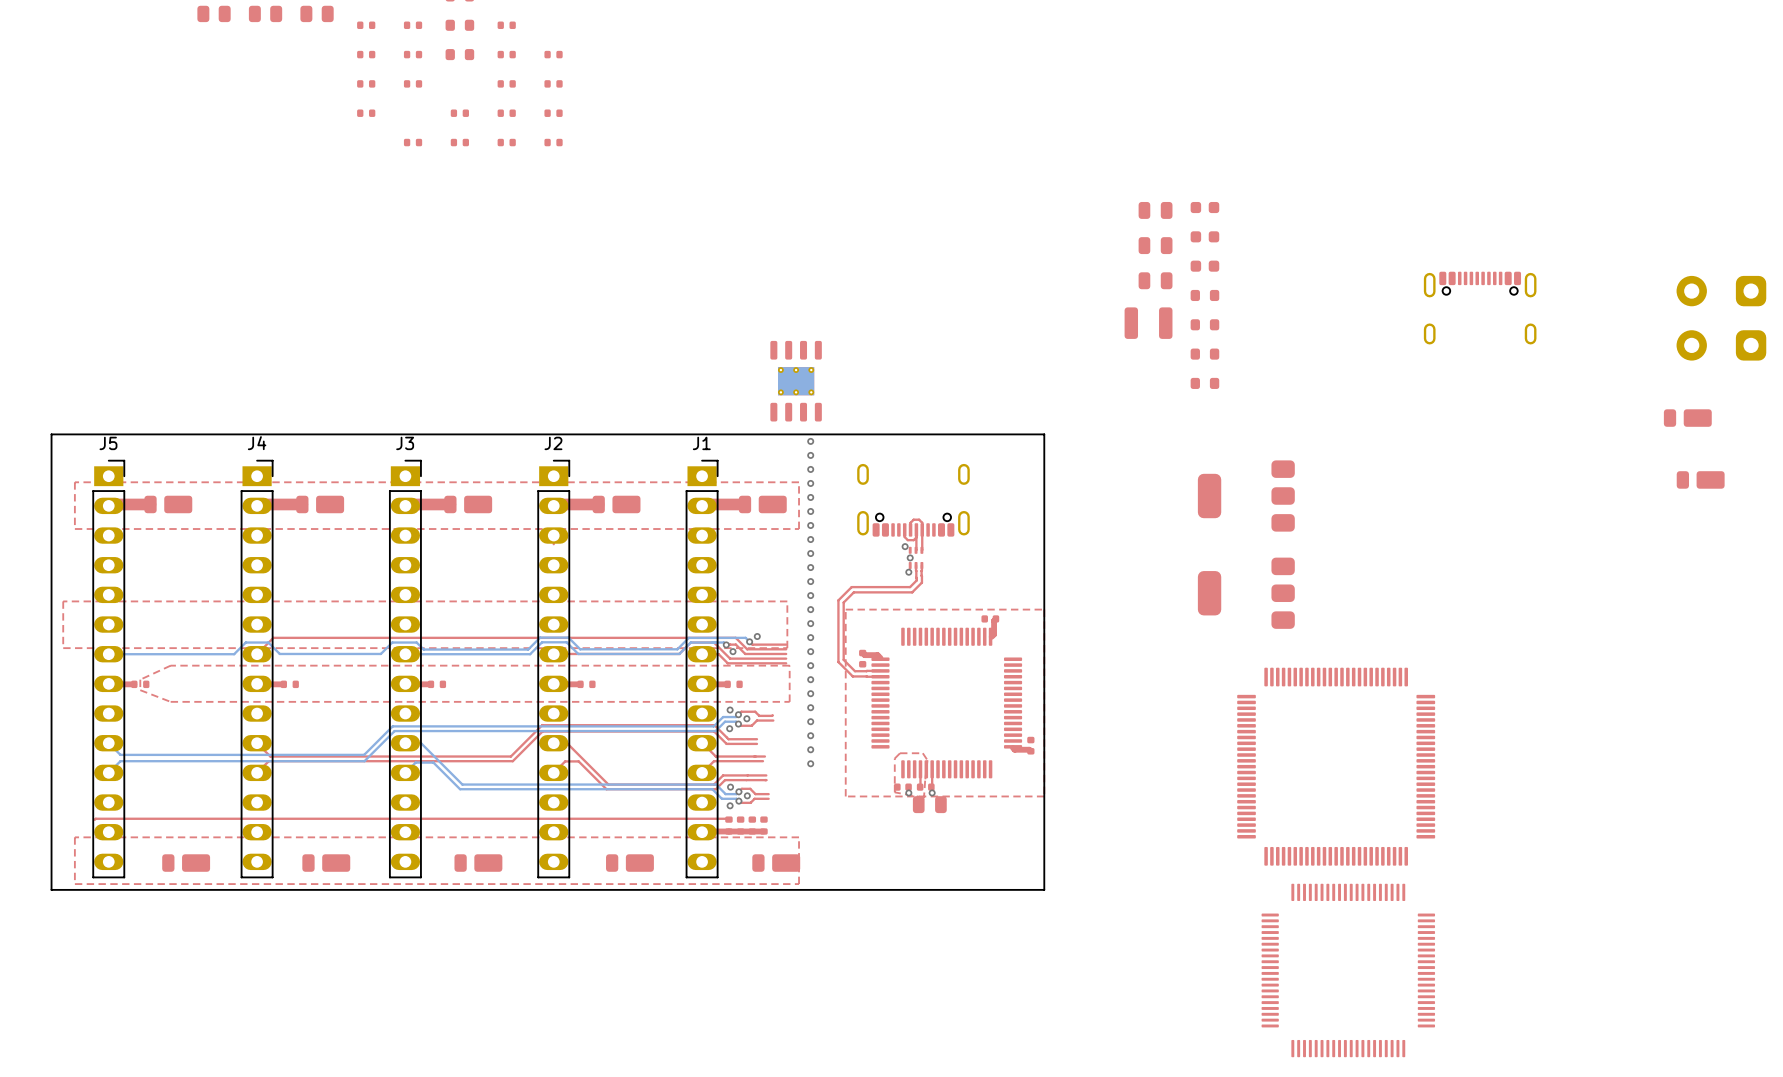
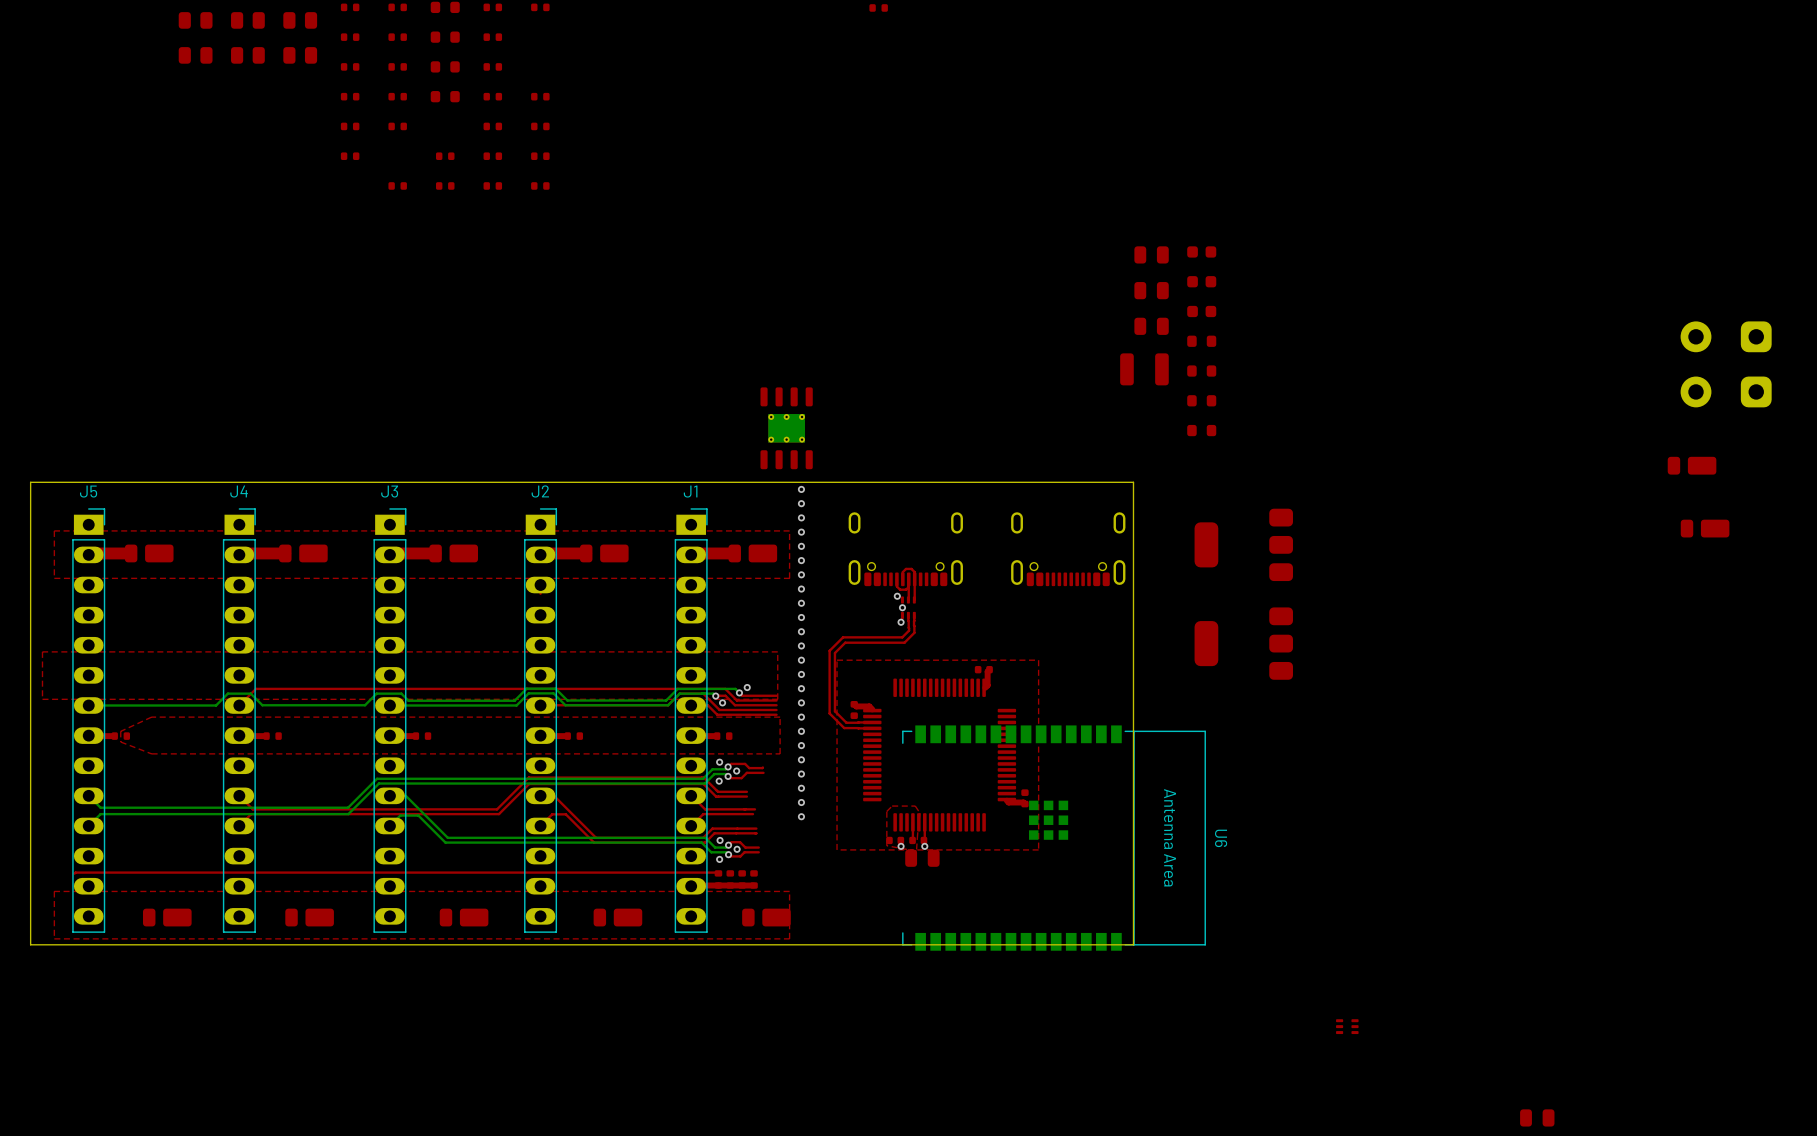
part: (1480, 308) -> none
board edge: (1044, 434) (1044, 889) -> (1038, 482) (1133, 482) (1133, 944) (1038, 944)
part: none -> (1068, 549)
part: (1336, 766) -> none
U6: none -> (1054, 838)
part footprint: [1261, 883, 1436, 1058] -> [1336, 1019, 1359, 1035]
part: none -> (1537, 1117)

